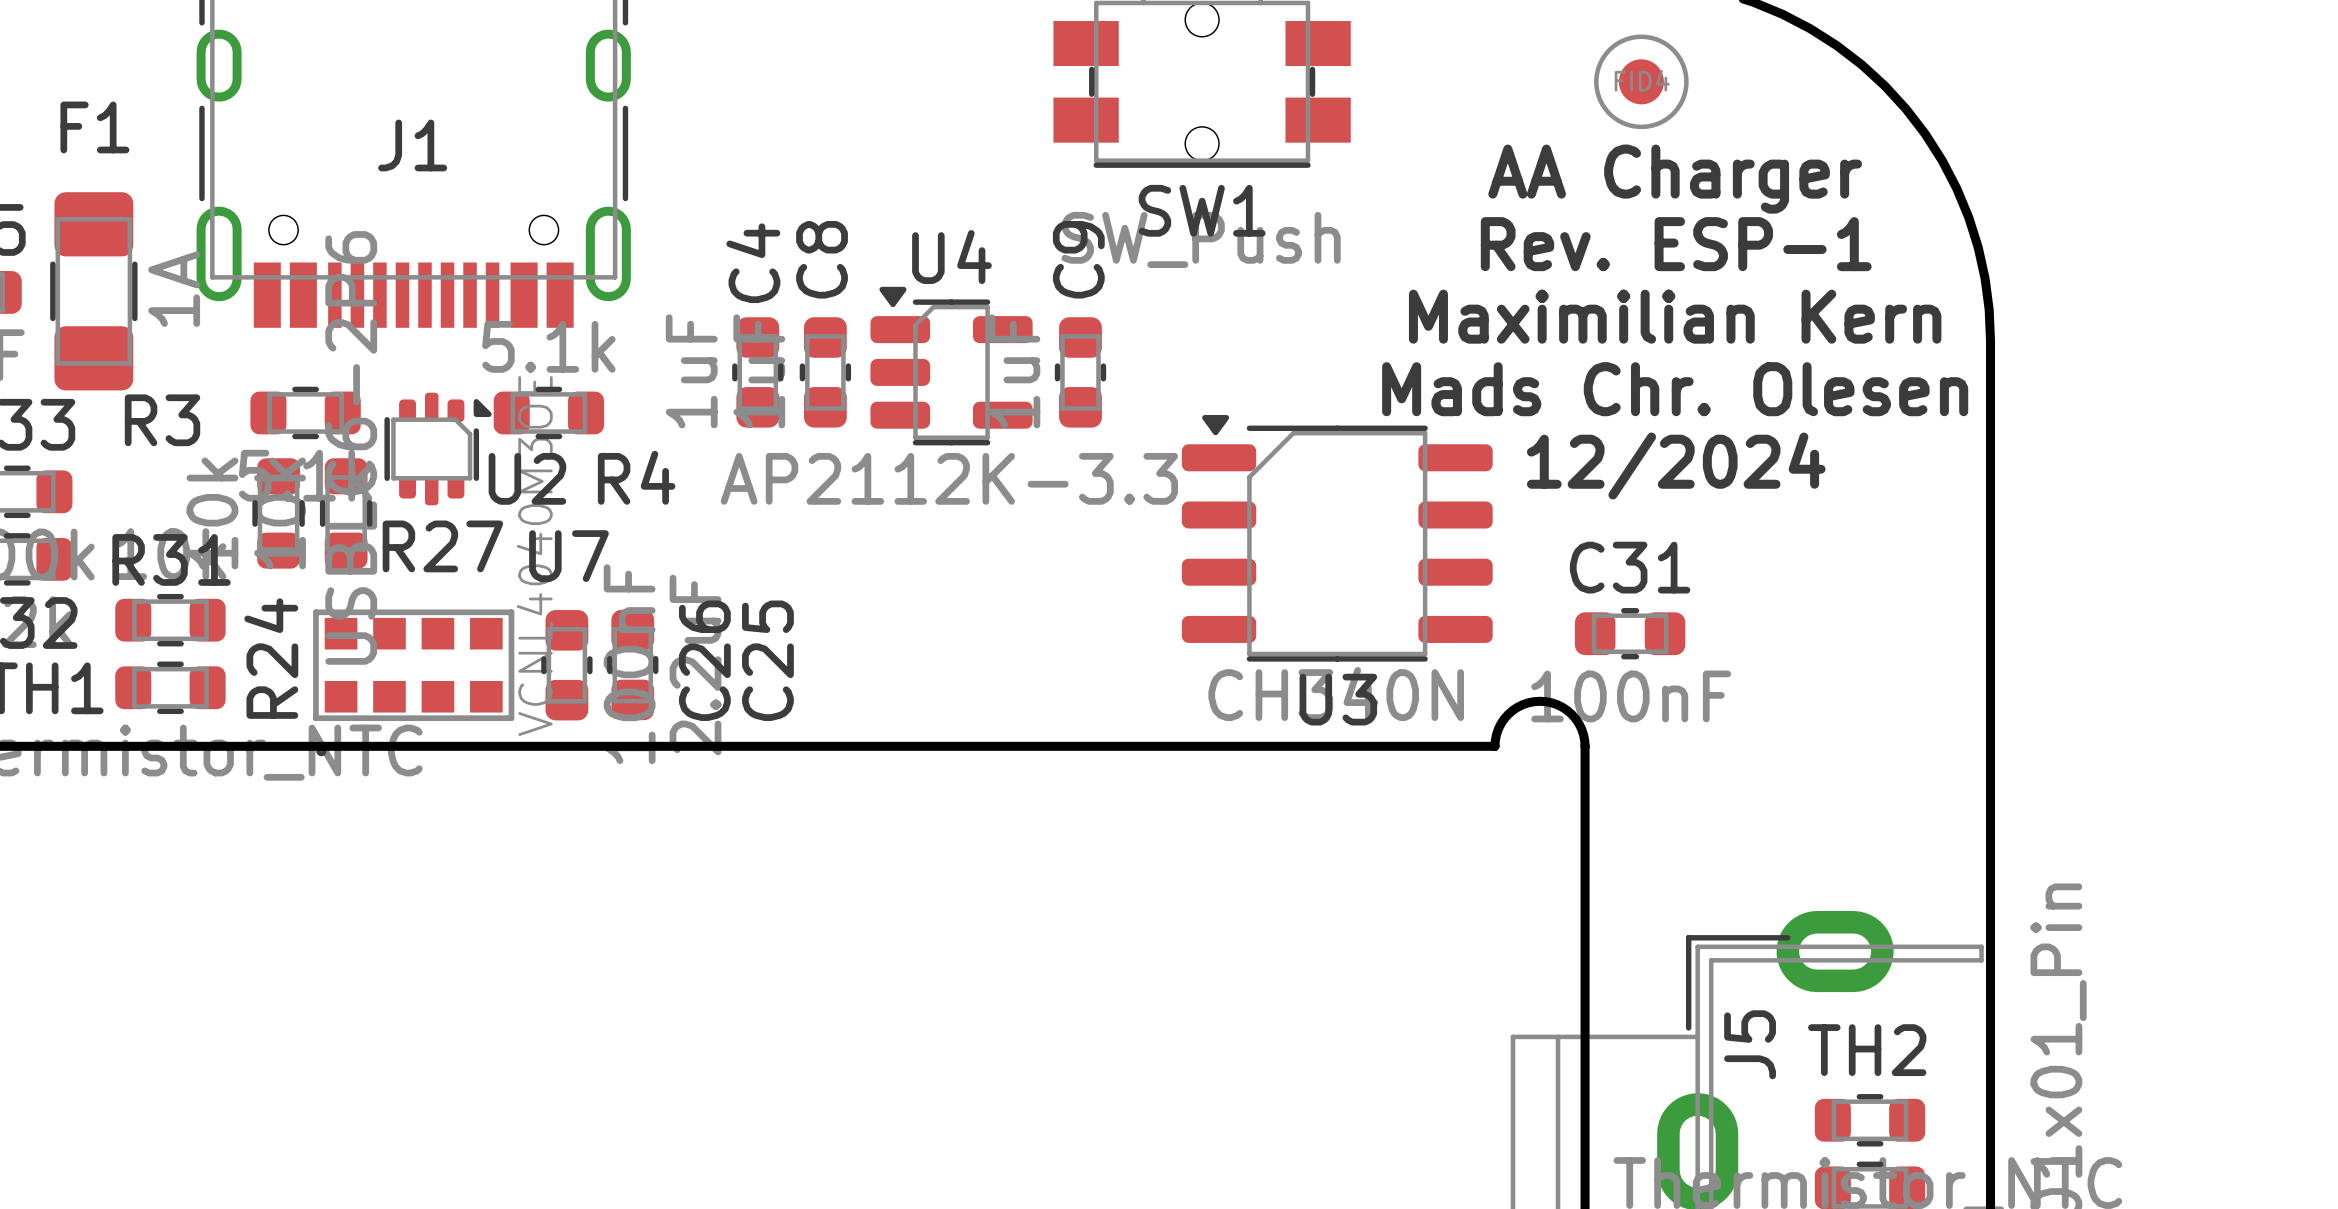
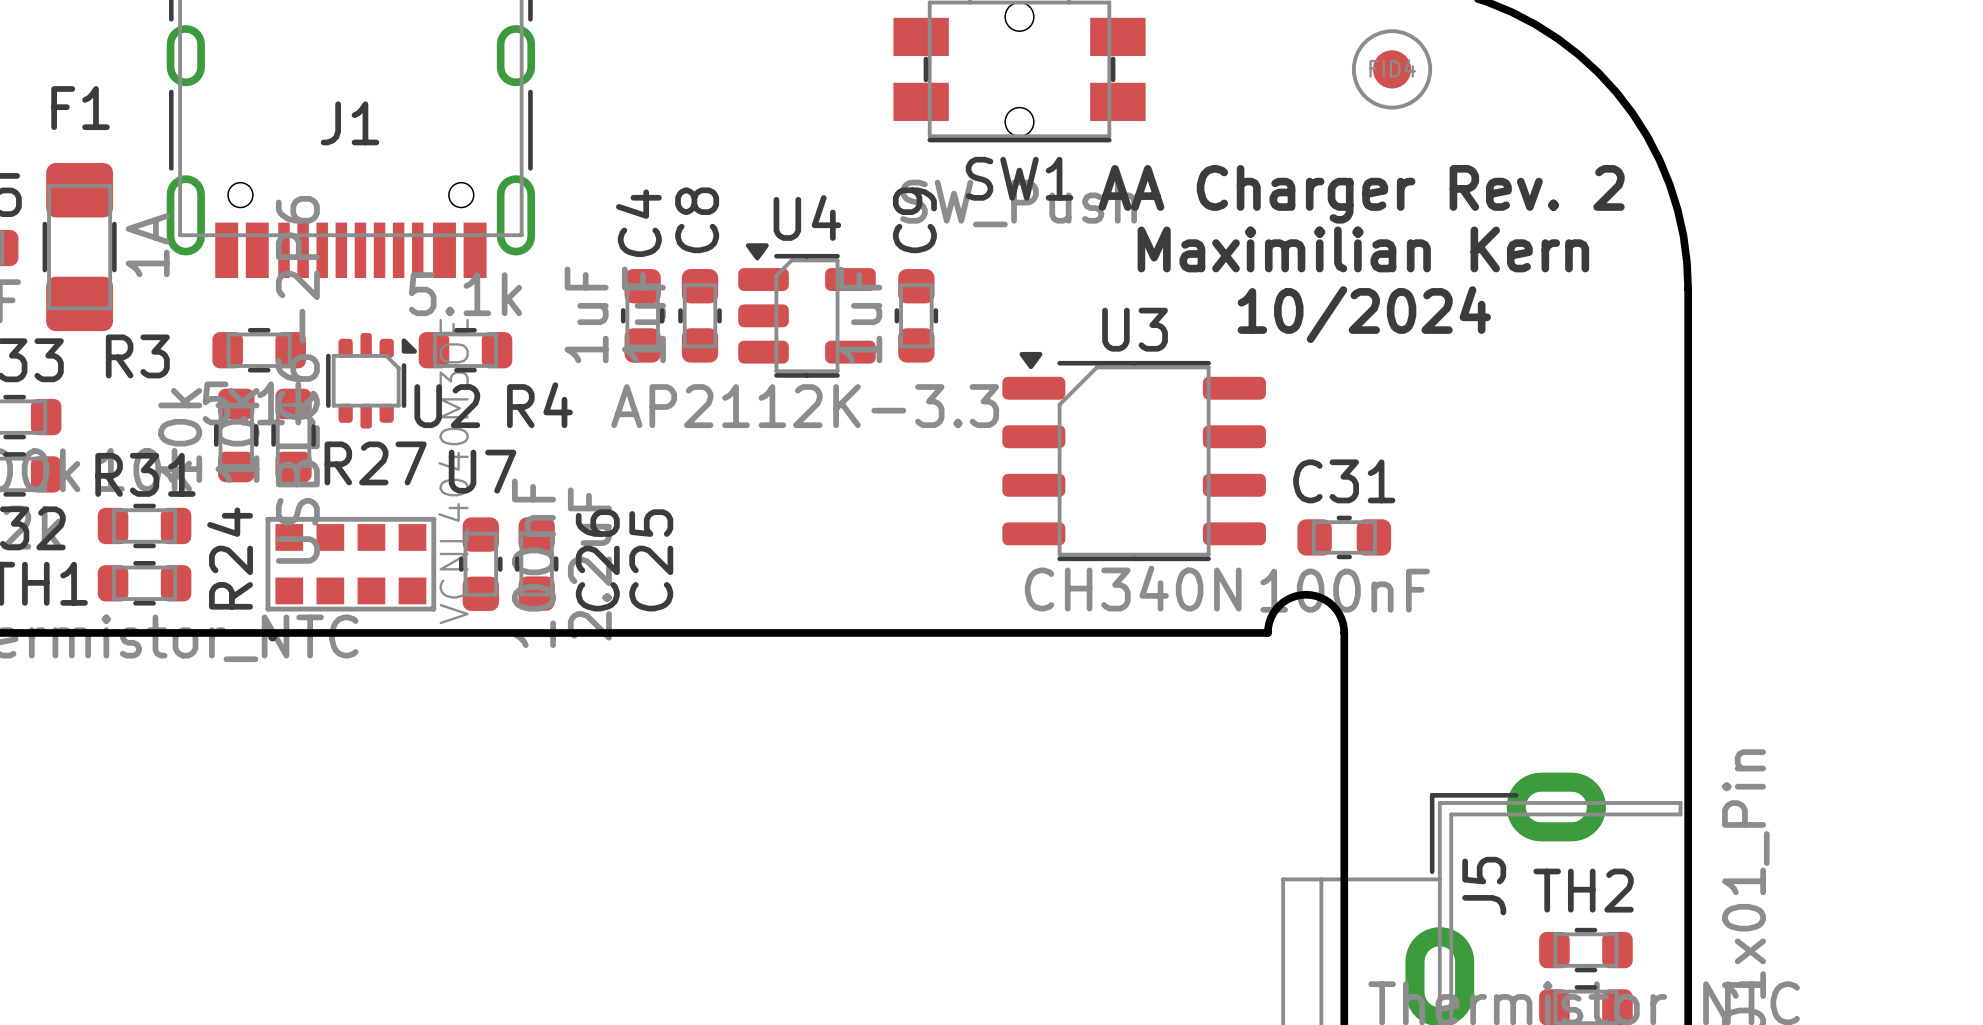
text: AA Charger (1675, 179) -> AA Charger Rev. 2 (1361, 194)
text: Rev. ESP-1 (1676, 244) -> none
text position: Maximilian Kern (1675, 316) -> Maximilian Kern (1363, 249)
text: none -> 10/2024 (1364, 314)
text: Mads Chr. Olesen (1675, 389) -> none
text: 12/2024 (1676, 466) -> none
C31 position: (1630, 633) -> (1344, 537)
U3 name position: U3 (1338, 699) -> U3 (1135, 329)

